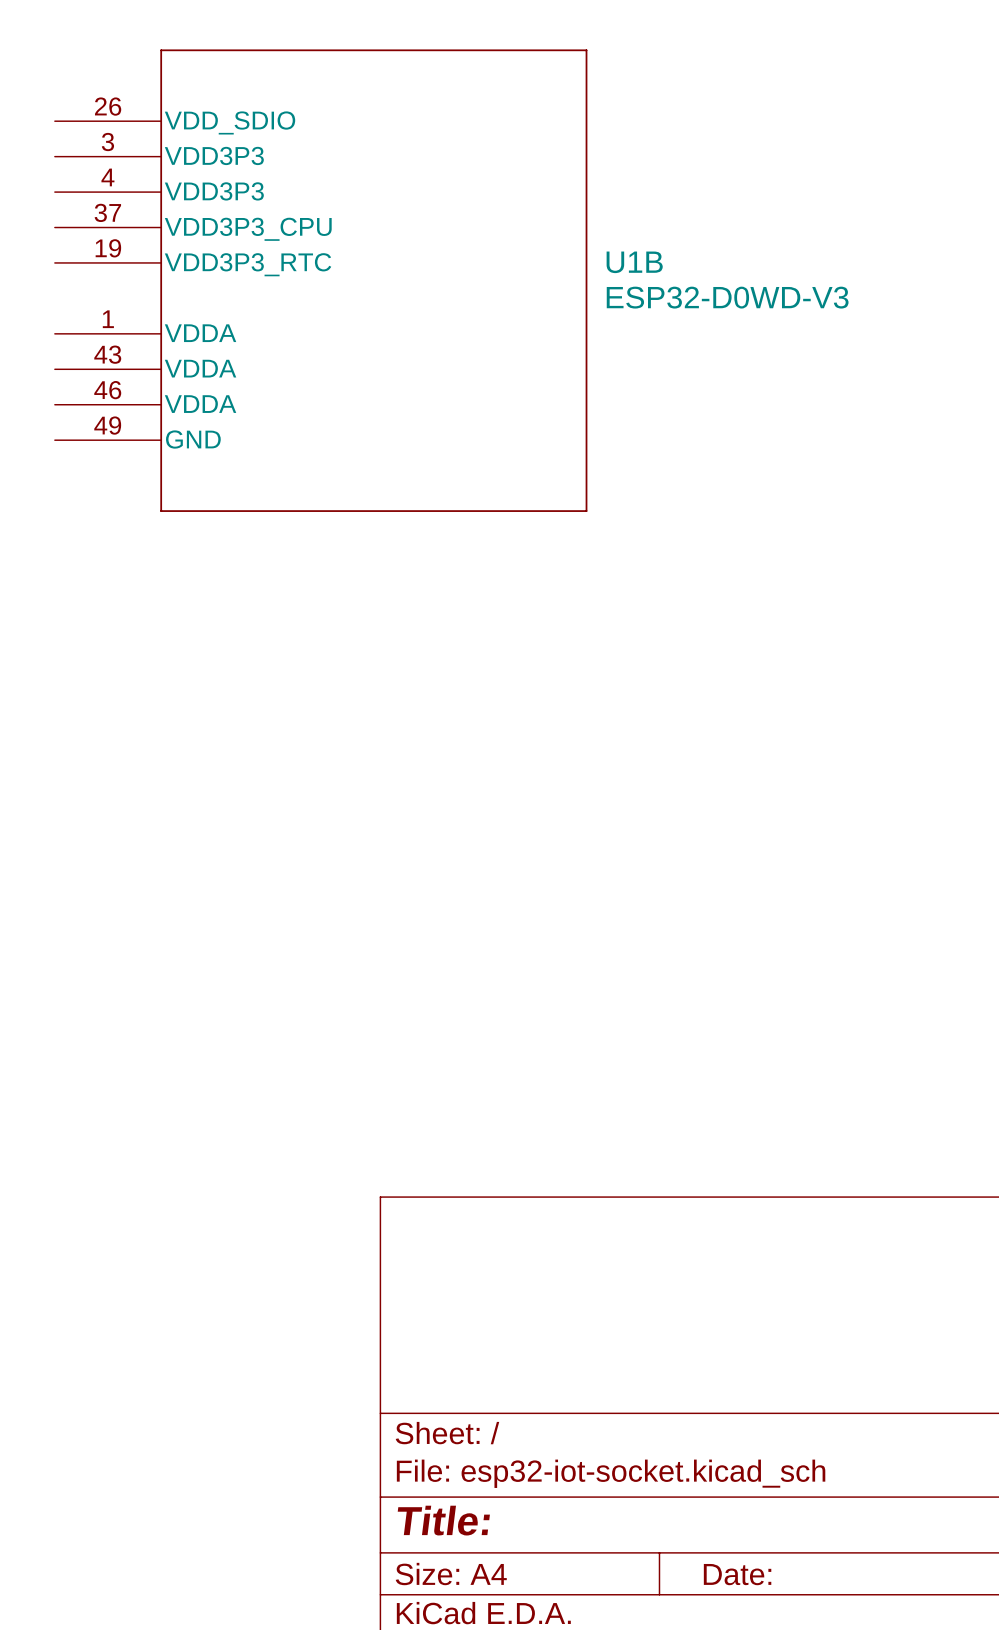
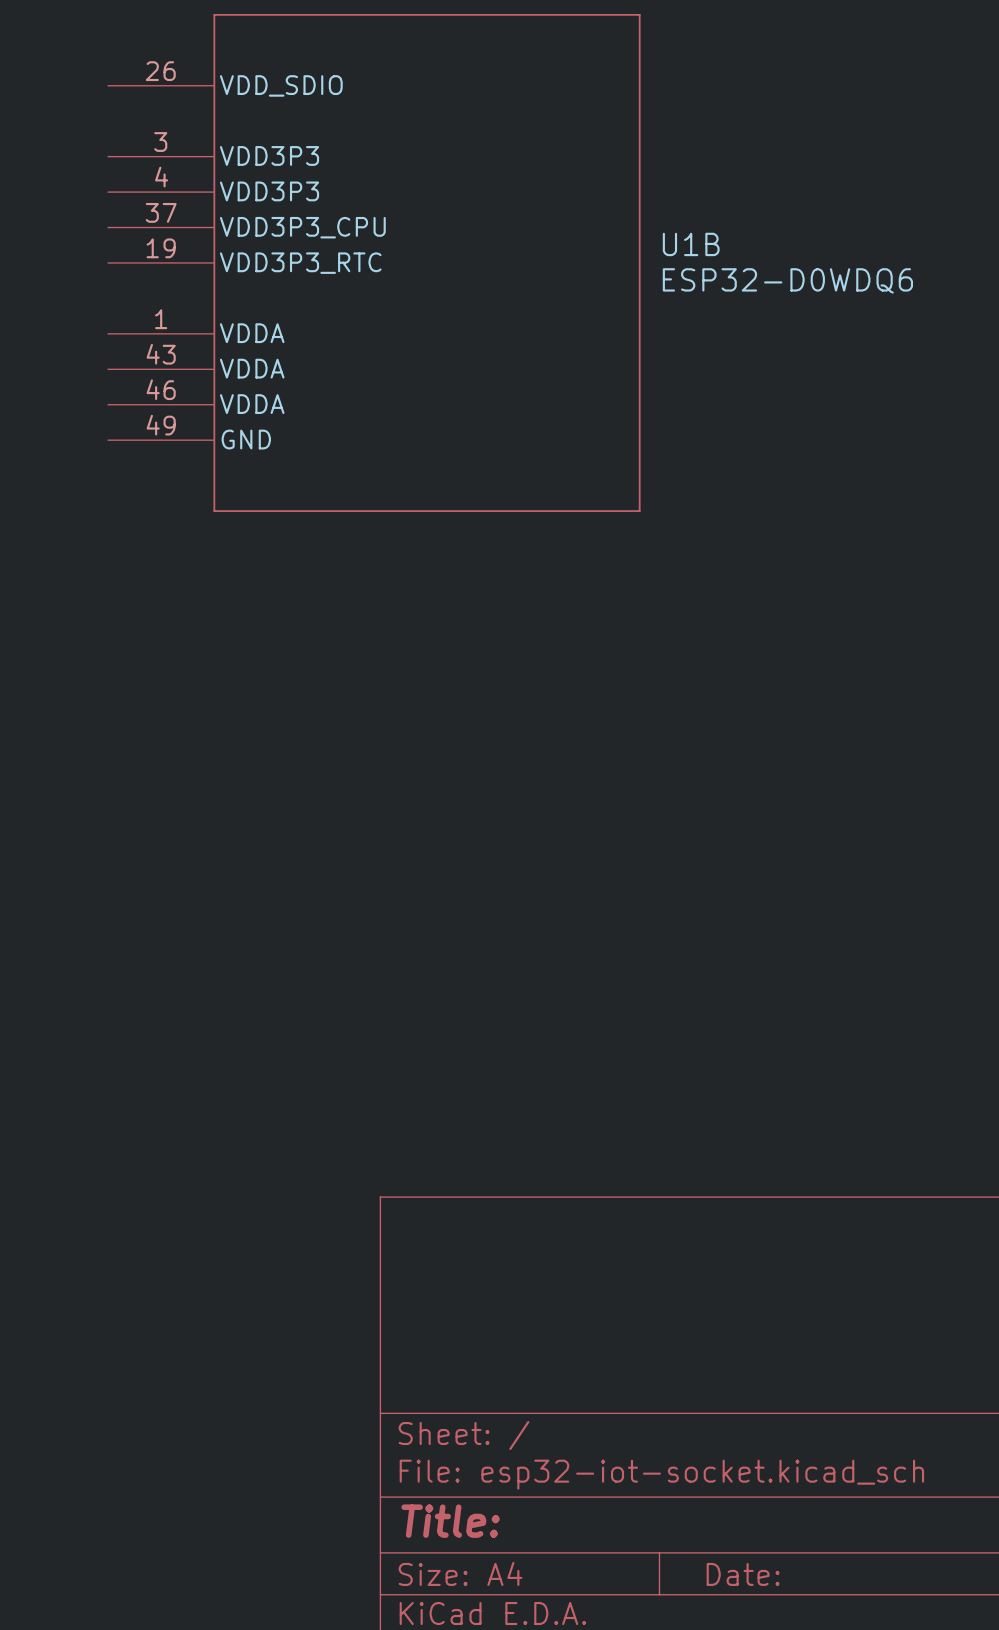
U1B symbol: [54, 49, 588, 512] -> [108, 13, 641, 512]
U1B value: ESP32-D0WD-V3 (727, 297) -> ESP32-D0WDQ6 (787, 280)

